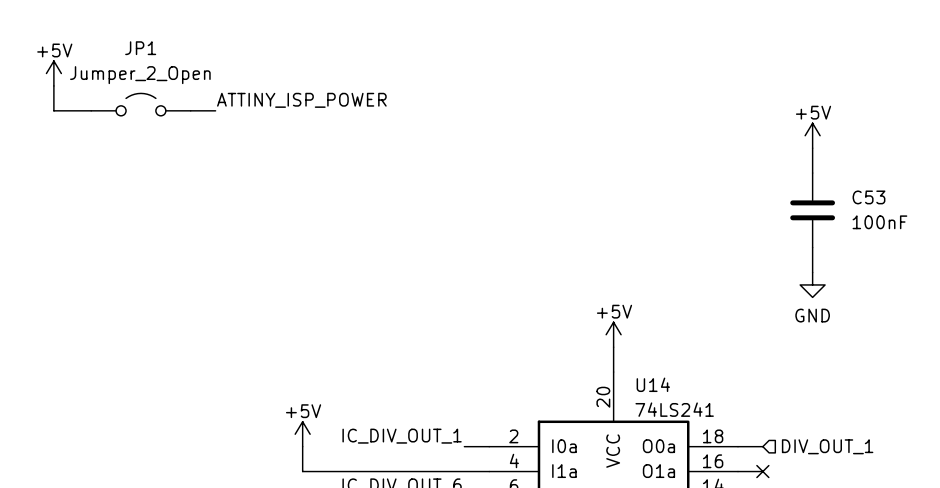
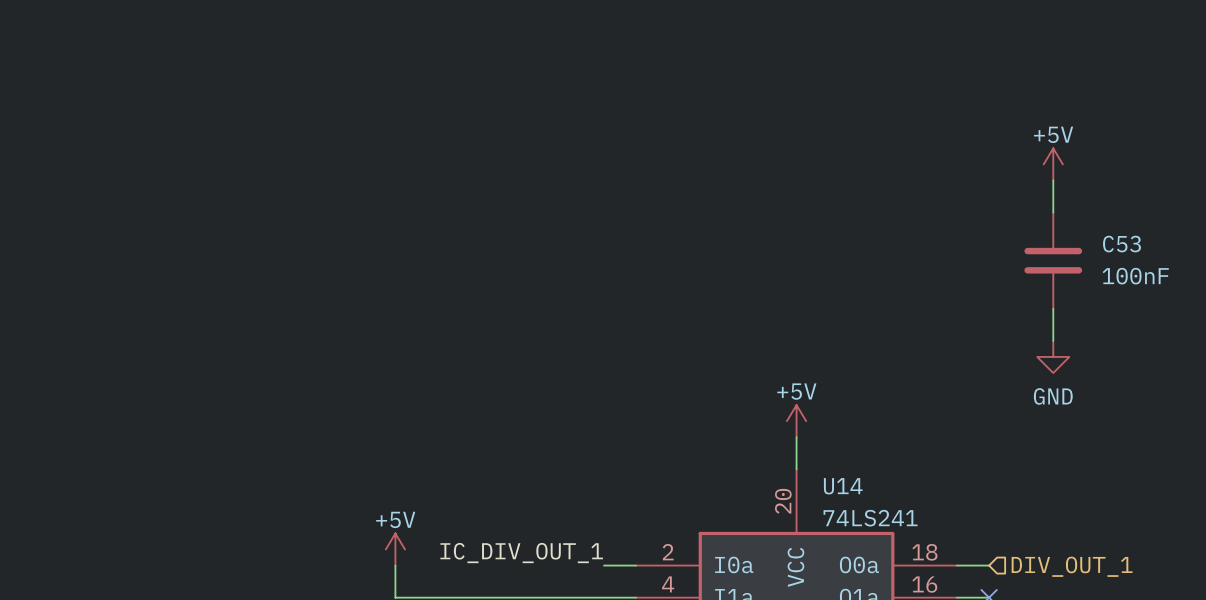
power symbol: +5V (53, 73) -> none
wire: (53, 85) (53, 110) (91, 110) -> none
label: ATTINY_ISP_POWER (301, 100) -> none
JP1: Jumper_2_Open (140, 104) -> none
wire: (190, 110) (215, 110) -> none

